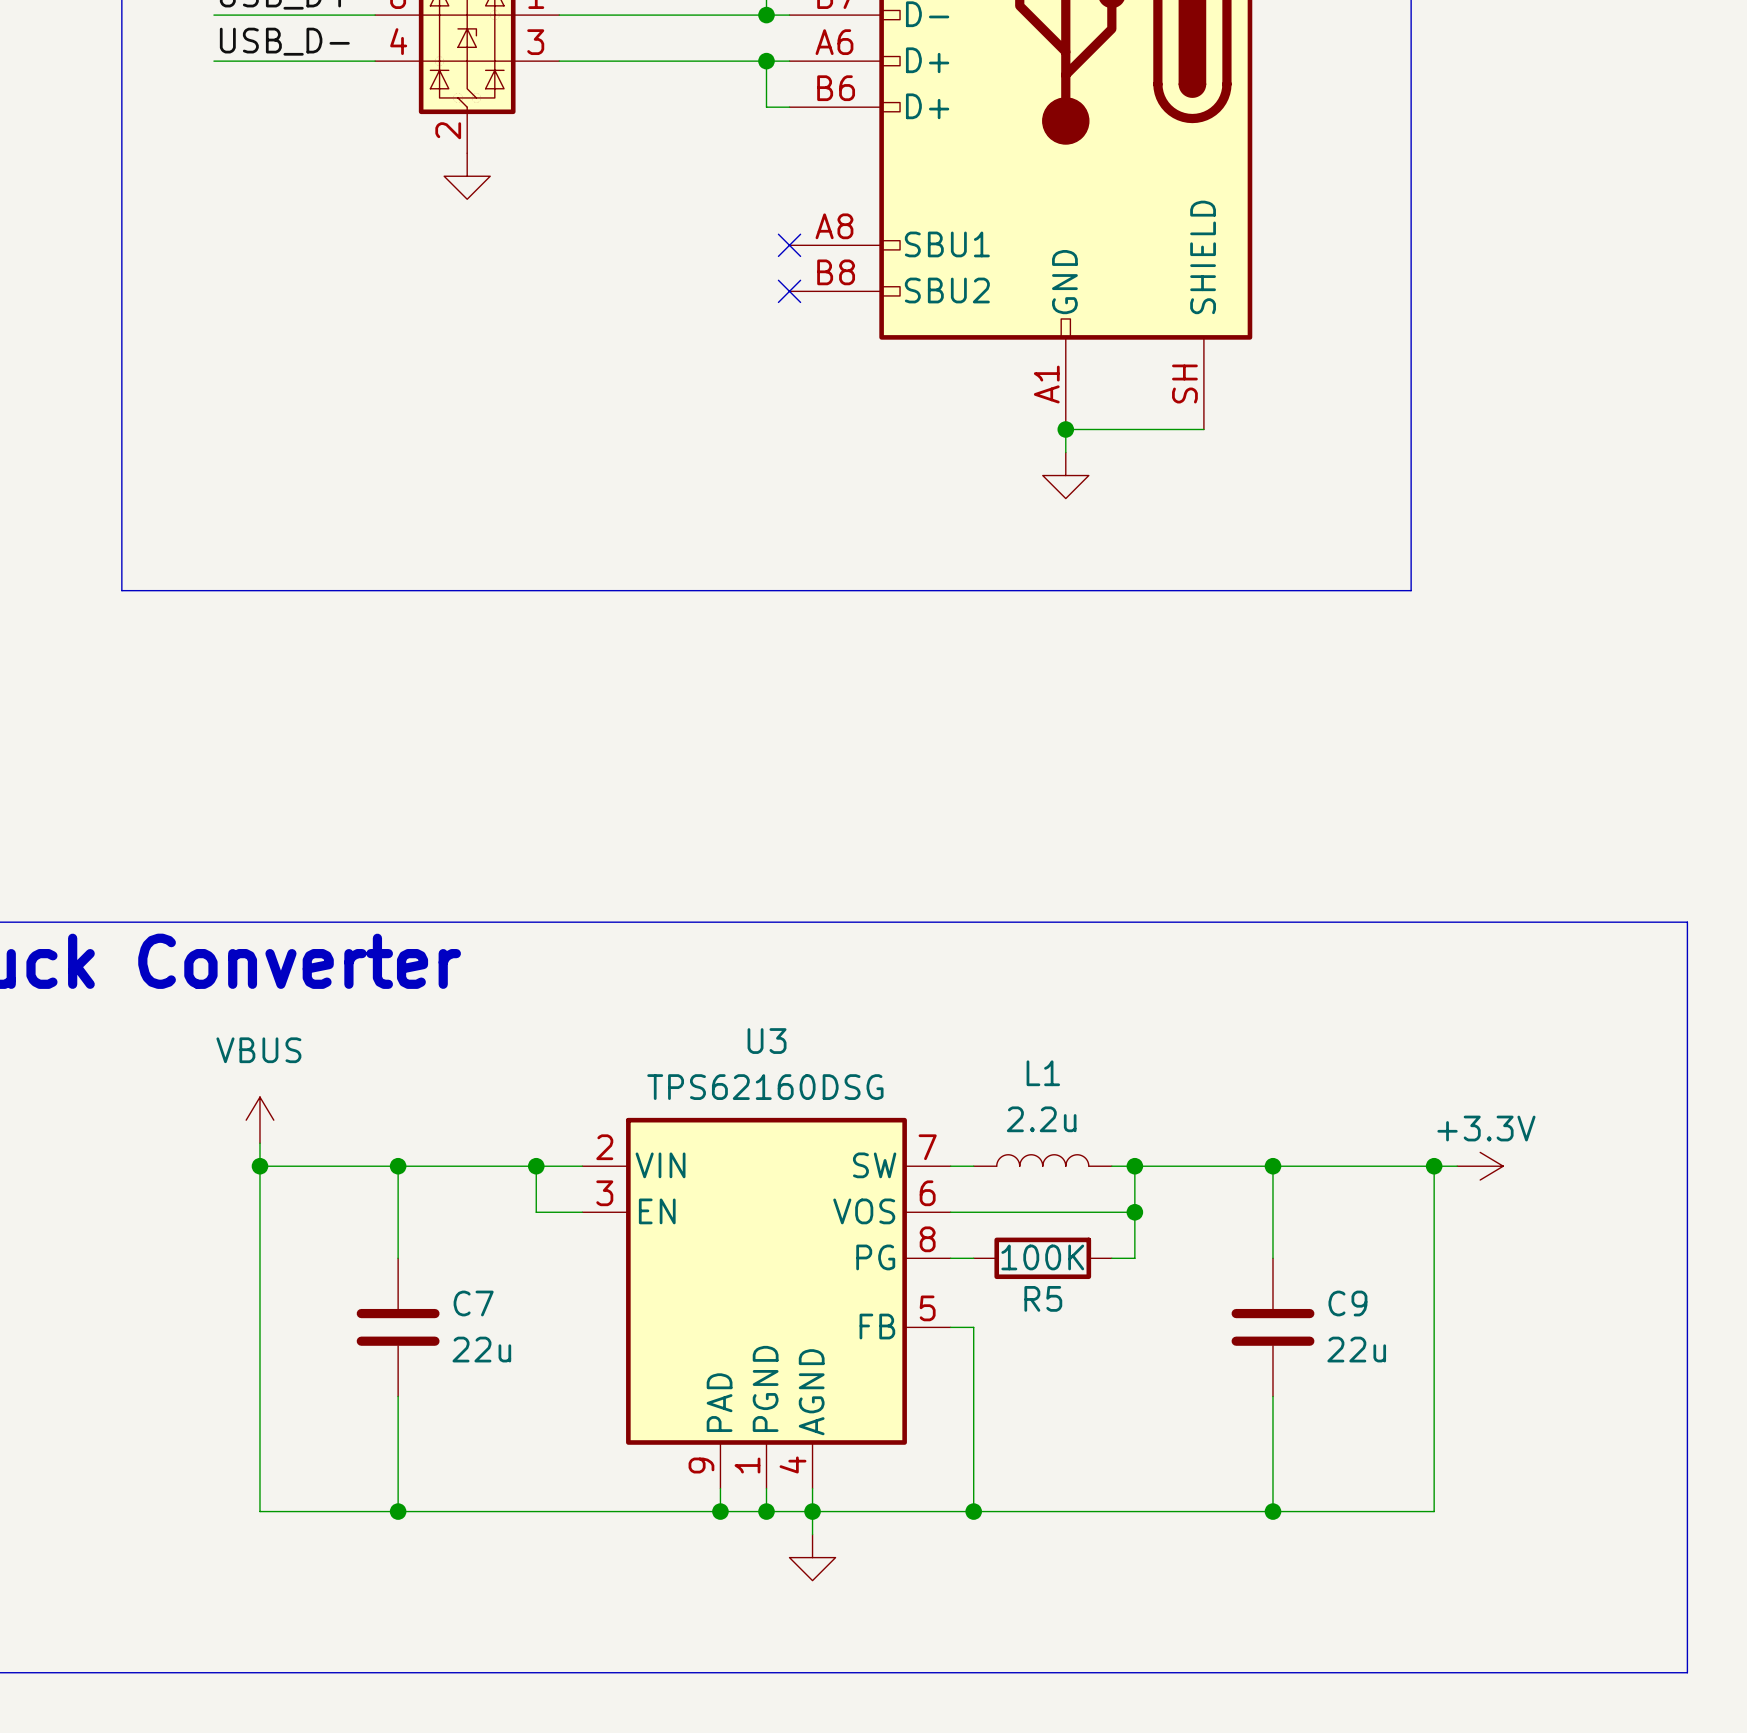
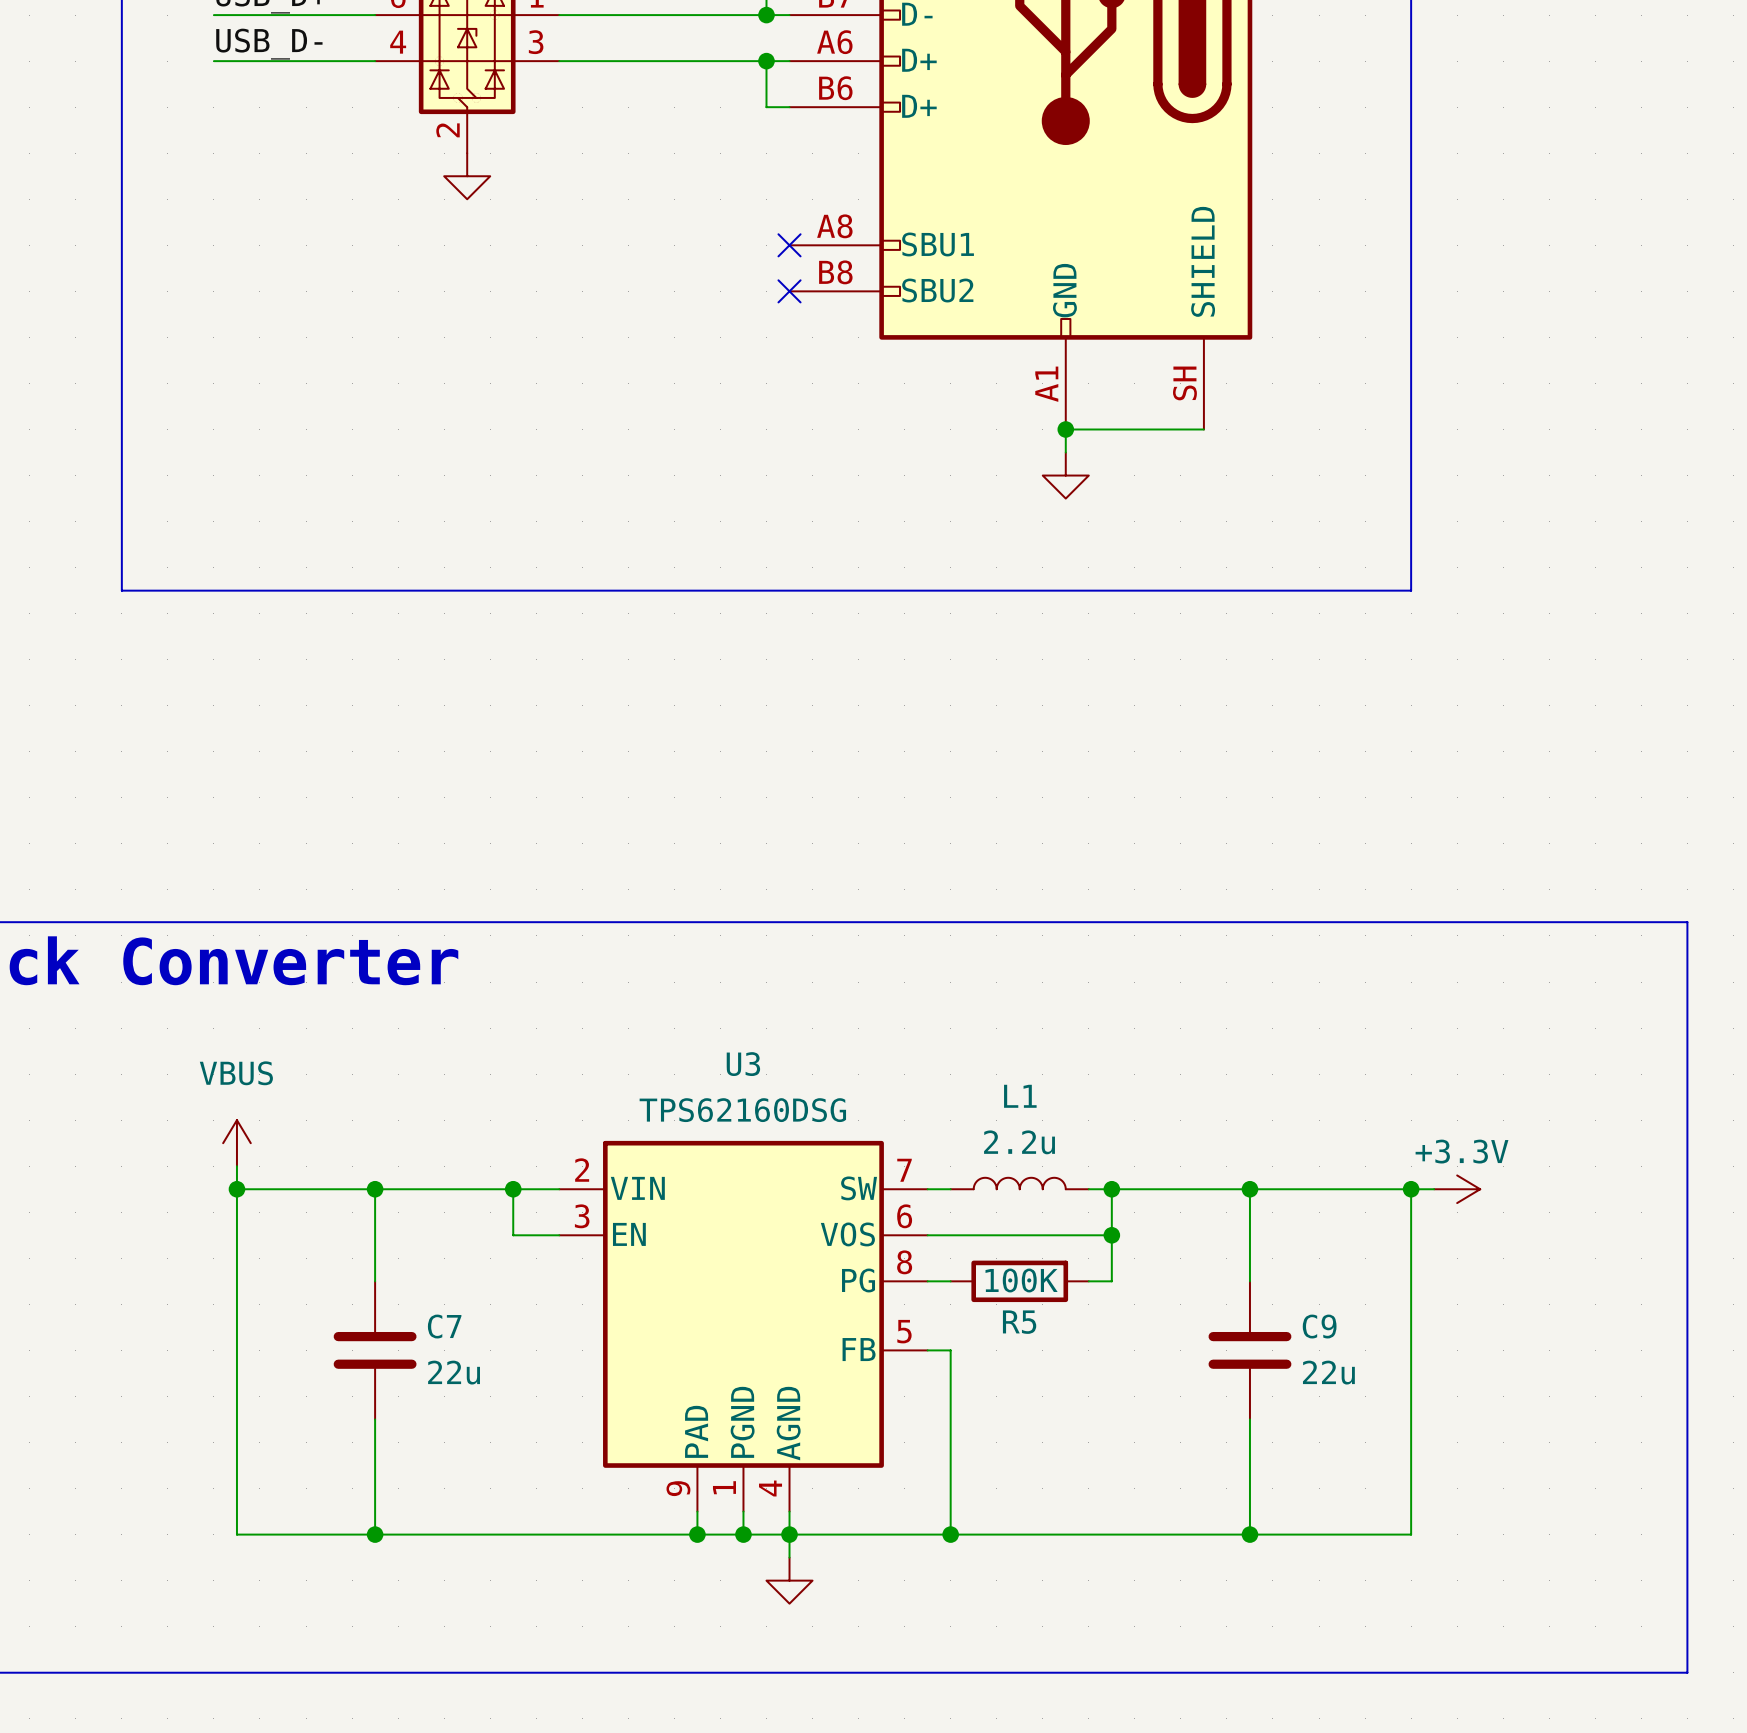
power symbol position: VBUS (259, 1120) -> VBUS (236, 1143)
wire: (259, 1143) (259, 1511) (1434, 1511) (1434, 1166) -> (236, 1166) (236, 1534) (1411, 1534) (1411, 1189)
L1 position: (1042, 1160) -> (1019, 1183)
wire: (259, 1166) (582, 1166) -> (236, 1189) (559, 1189)
junction position: (259, 1166) -> (236, 1189)
wire: (398, 1166) (398, 1258) -> (375, 1189) (375, 1281)
junction position: (398, 1166) -> (375, 1189)
wire: (536, 1166) (536, 1212) (582, 1212) -> (513, 1189) (513, 1235) (559, 1235)
junction position: (536, 1166) -> (513, 1189)
wire: (950, 1166) (973, 1166) -> (927, 1189) (950, 1189)
wire: (1111, 1166) (1457, 1166) -> (1088, 1189) (1434, 1189)
wire: (1134, 1166) (1134, 1258) (1111, 1258) -> (1111, 1189) (1111, 1281) (1088, 1281)
junction: (1134, 1166) -> none
wire: (1272, 1166) (1272, 1258) -> (1249, 1189) (1249, 1281)
junction position: (1272, 1166) -> (1249, 1189)
junction position: (1434, 1166) -> (1411, 1189)
power symbol position: +3.3V (1480, 1166) -> +3.3V (1457, 1189)
junction: none -> (1111, 1189)
wire: (950, 1212) (1134, 1212) -> (927, 1235) (1111, 1235)
junction: (1134, 1212) -> none
junction: none -> (1111, 1235)
wire: (950, 1258) (973, 1258) -> (927, 1281) (950, 1281)
R5 position: (1042, 1258) -> (1019, 1281)
U3 position: (766, 1303) -> (743, 1326)
C7 position: (398, 1327) -> (375, 1350)
wire: (950, 1327) (973, 1327) (973, 1511) -> (927, 1350) (950, 1350) (950, 1534)
C9 position: (1272, 1327) -> (1249, 1350)
wire: (398, 1396) (398, 1511) -> (375, 1419) (375, 1534)
wire: (1272, 1396) (1272, 1511) -> (1249, 1419) (1249, 1534)
wire: (720, 1488) (720, 1511) -> (697, 1511) (697, 1534)
wire: (766, 1488) (766, 1511) -> (743, 1511) (743, 1534)
wire: (812, 1488) (812, 1534) -> (789, 1511) (789, 1557)
junction position: (398, 1511) -> (375, 1534)
junction: (720, 1511) -> none
junction: (766, 1511) -> none
junction: (812, 1511) -> none
junction position: (973, 1511) -> (950, 1534)
junction position: (1272, 1511) -> (1249, 1534)
junction: none -> (697, 1534)
junction: none -> (743, 1534)
junction: none -> (789, 1534)
power symbol position: (812, 1557) -> (789, 1580)

